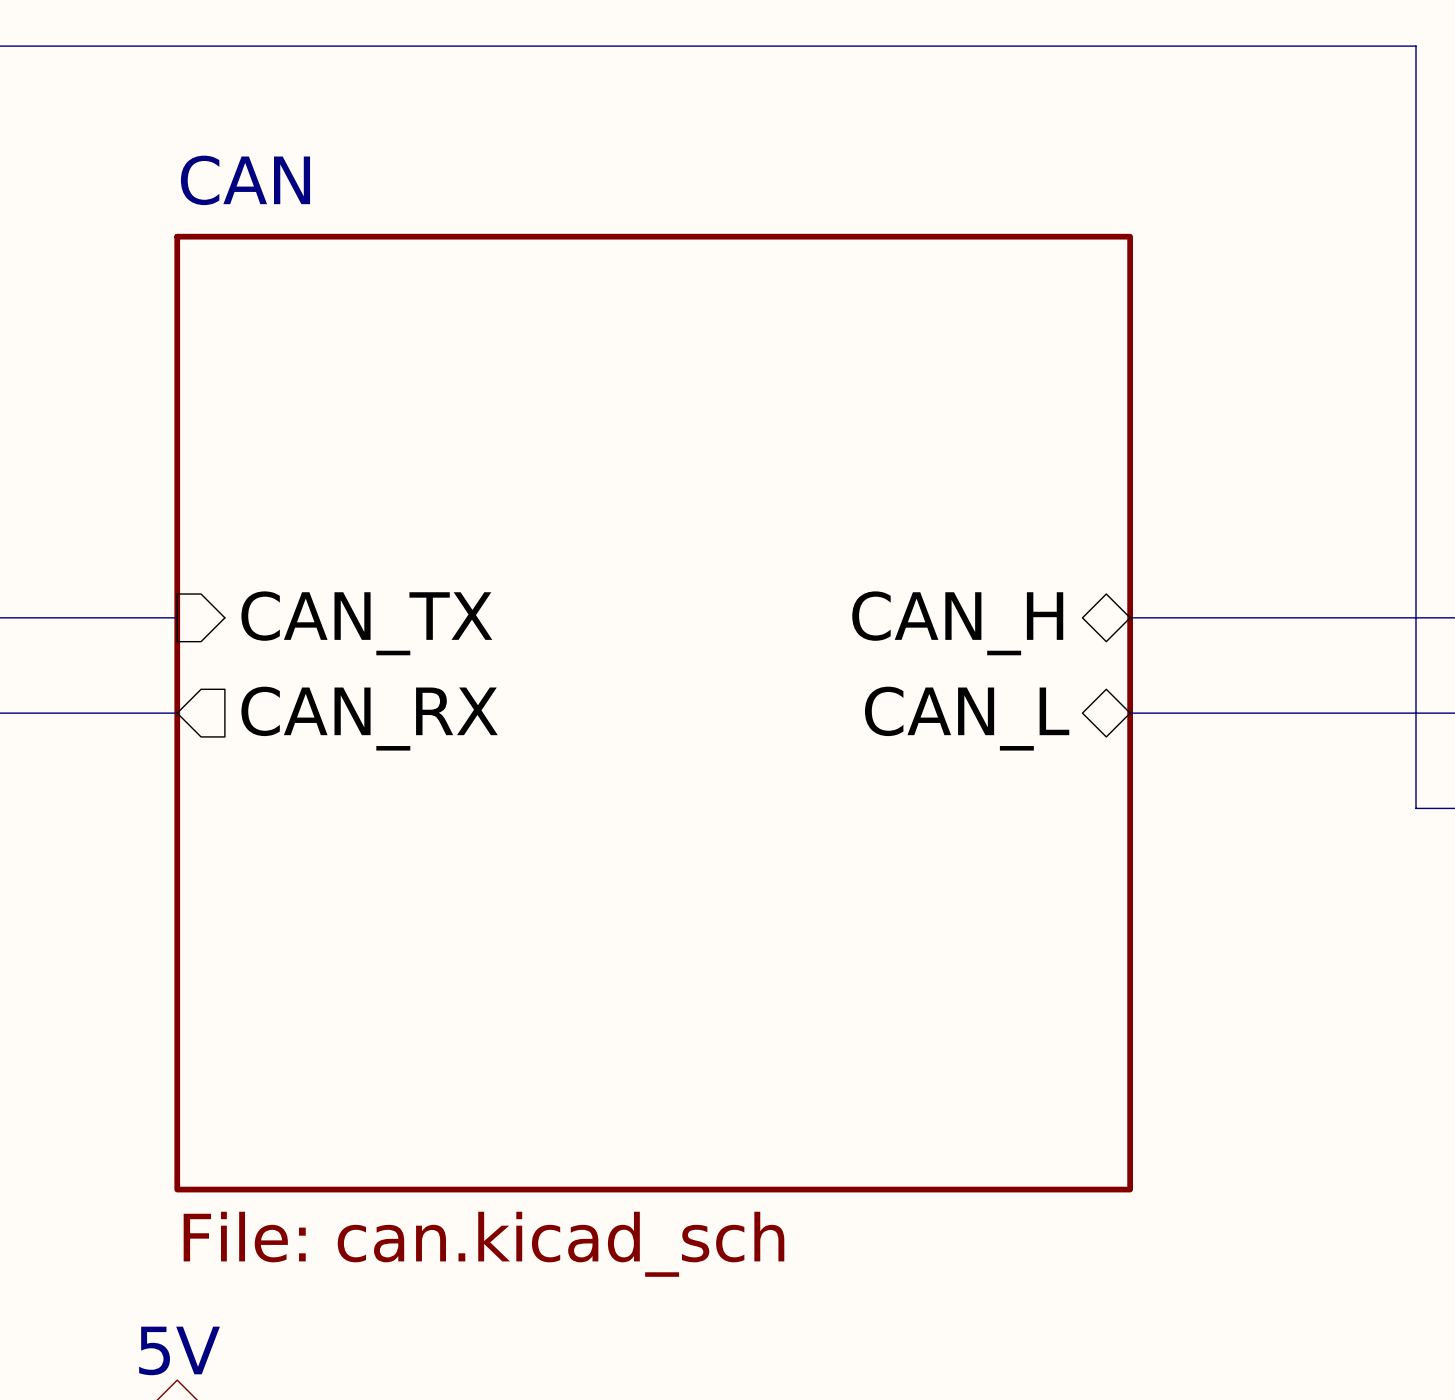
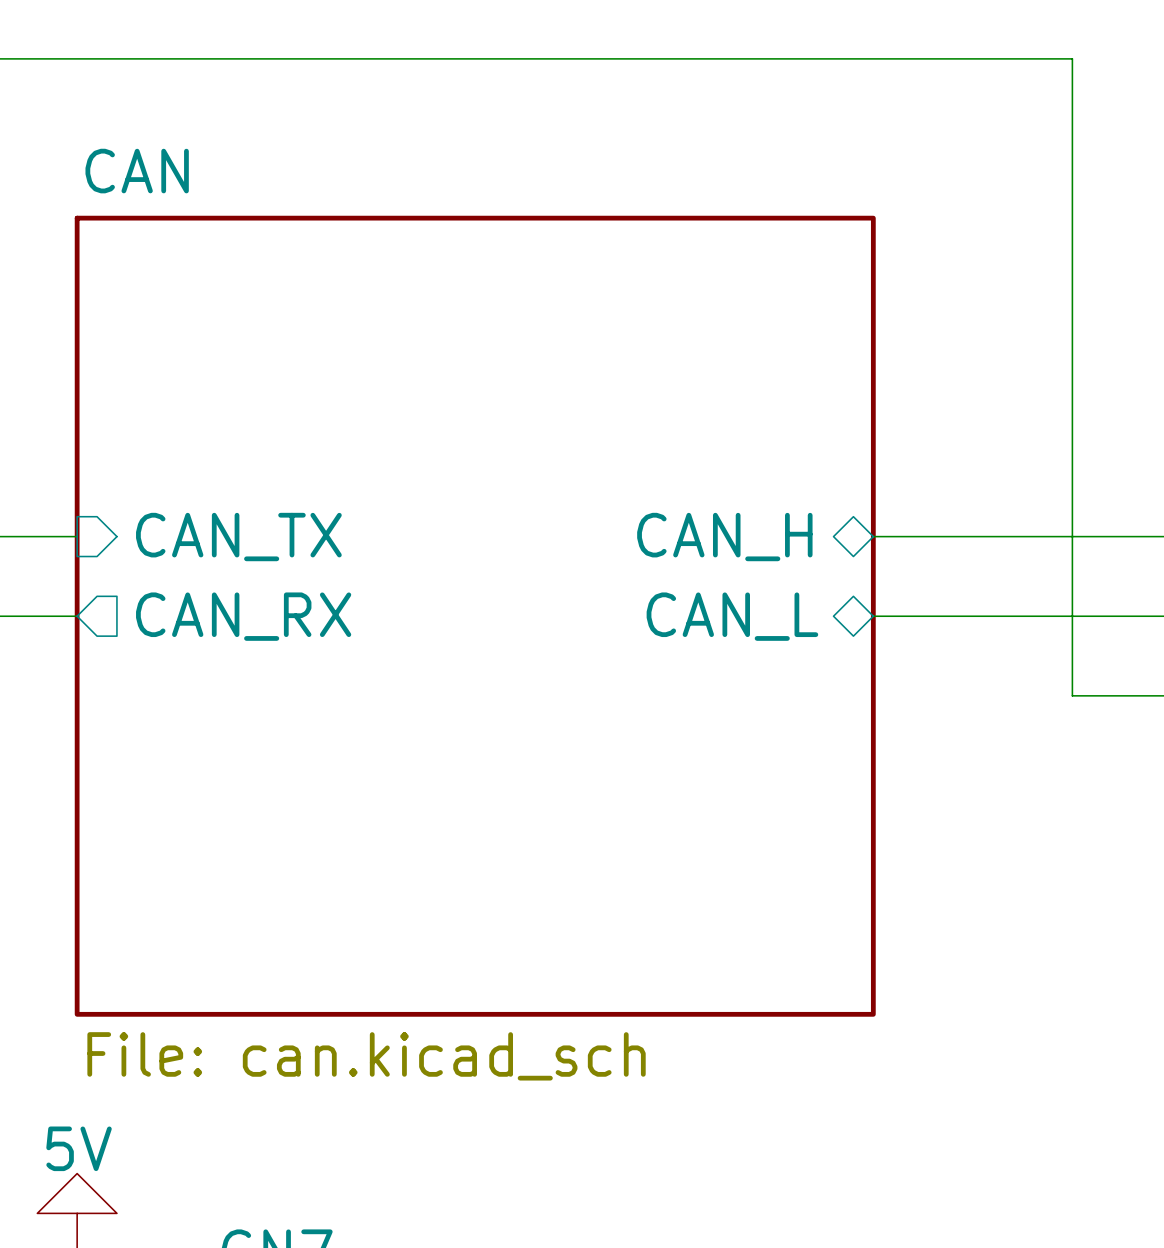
wire: (1368, 46) (1415, 46) (1415, 808) -> (1072, 58) (1072, 695) (1112, 695)

